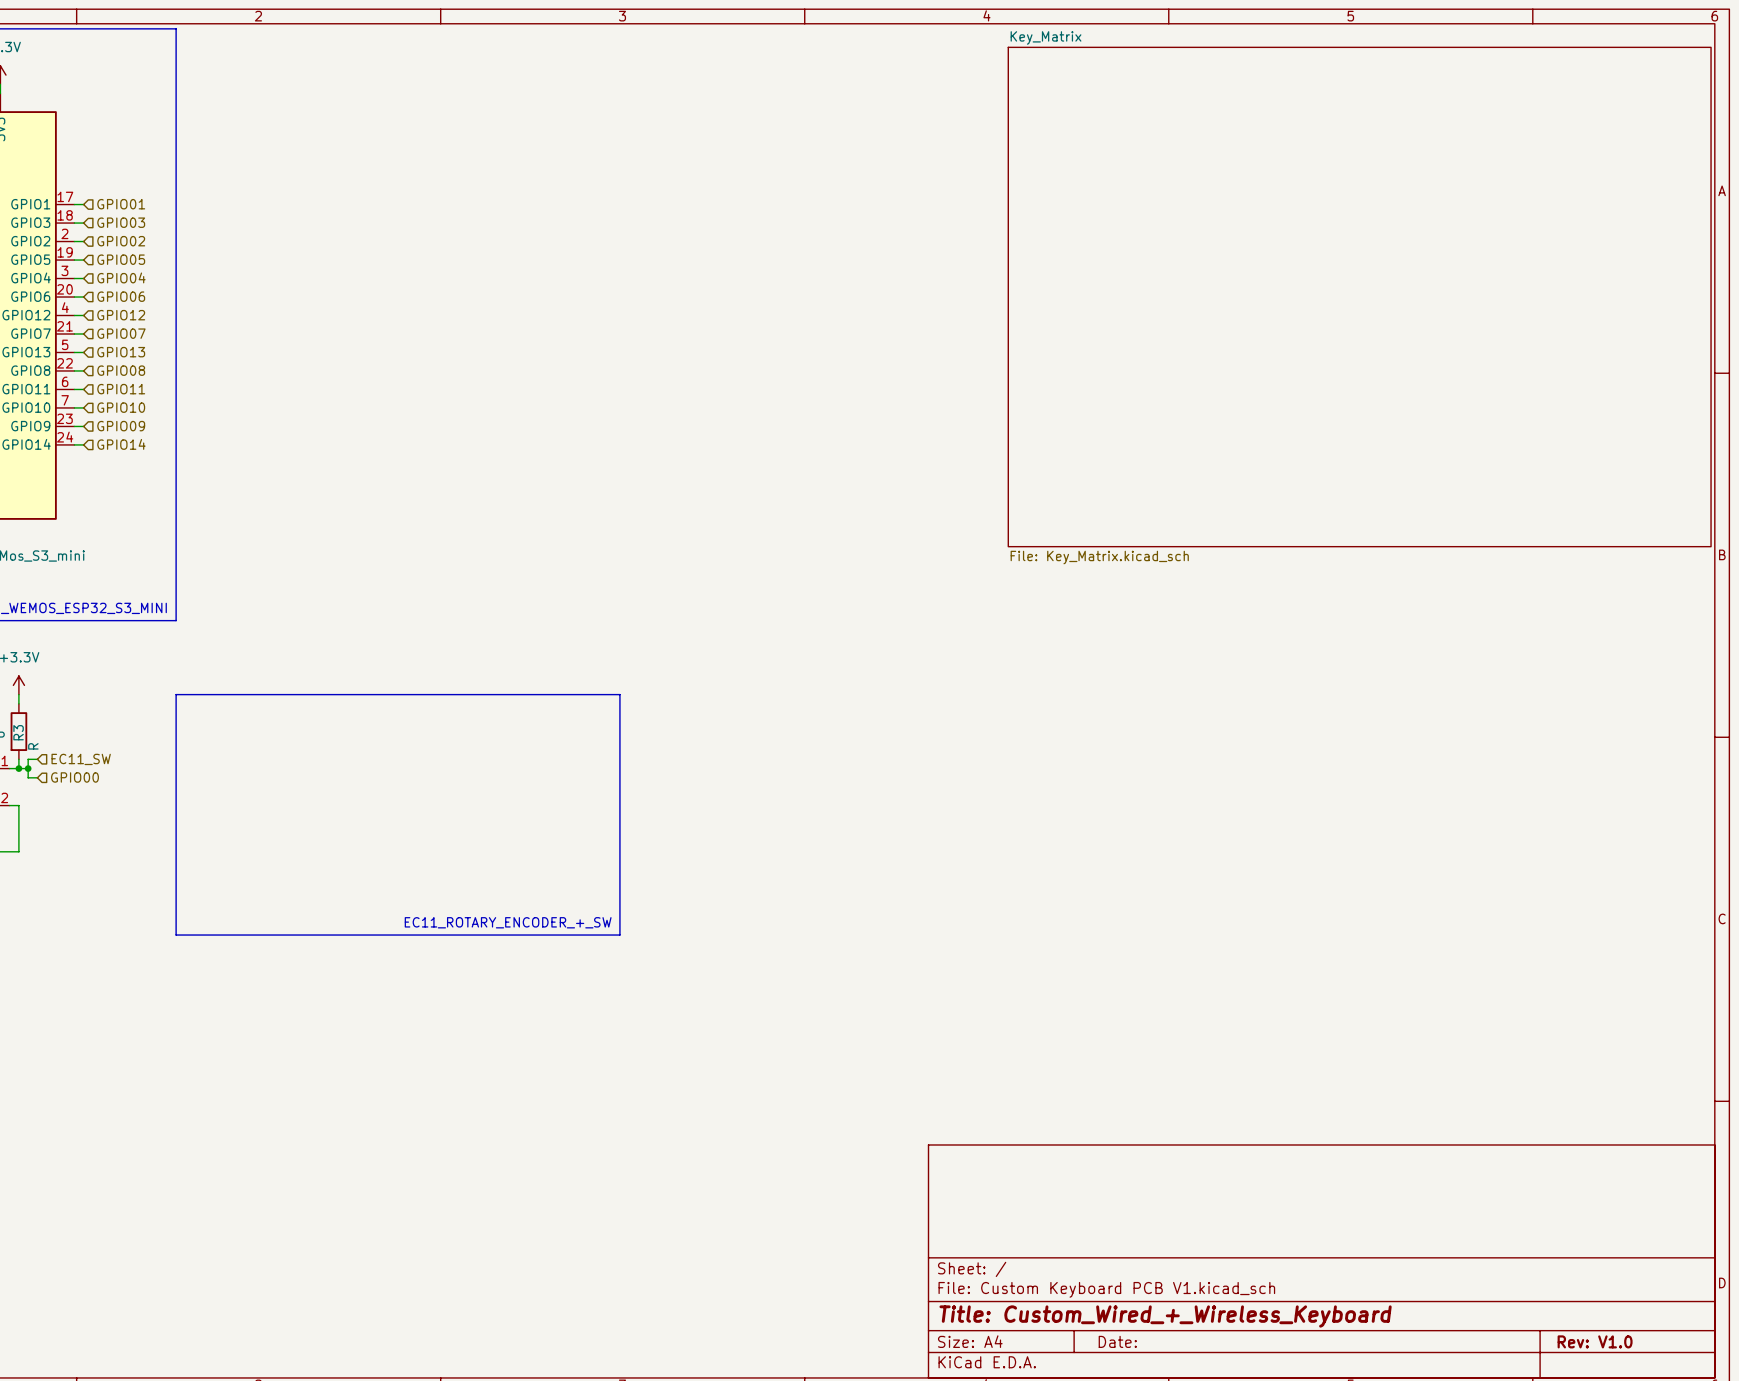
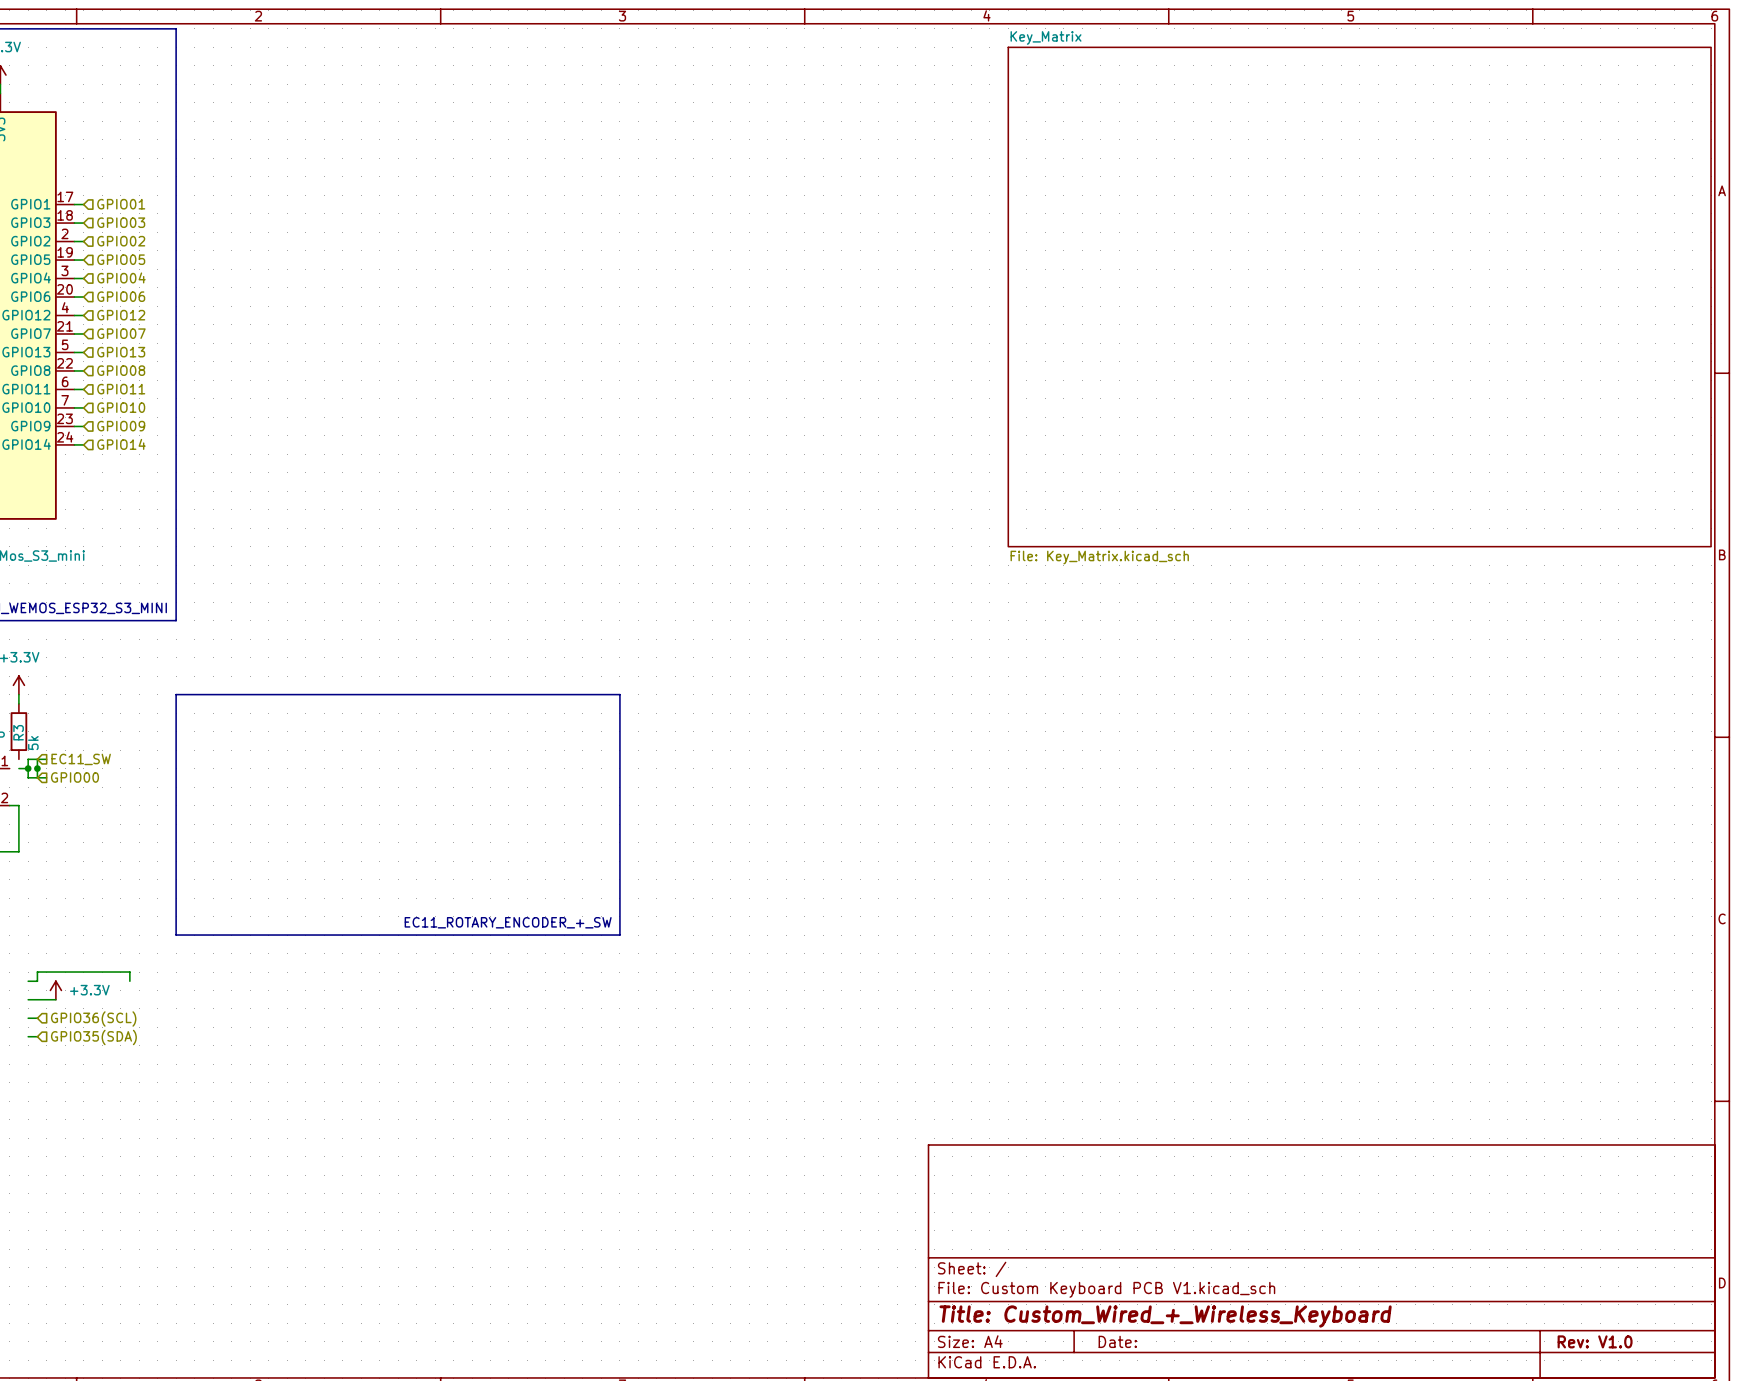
R3 value: R (33, 746) -> 5k (33, 743)
wire: (18, 759) (18, 768) (9, 768) -> none
wire: none -> (46, 759) (37, 759) (37, 777) (46, 777)
junction position: (18, 768) -> (37, 768)
wire: none -> (28, 981) (37, 981) (37, 972) (129, 972) (129, 981)
power symbol: none -> +3.3V (55, 990)
wire: none -> (28, 999) (55, 999)
wire: none -> (28, 1018) (37, 1018)
hierarchical label: none -> GPIO36(SCL) (93, 1018)
wire: none -> (28, 1036) (37, 1036)
hierarchical label: none -> GPIO35(SDA) (93, 1037)

